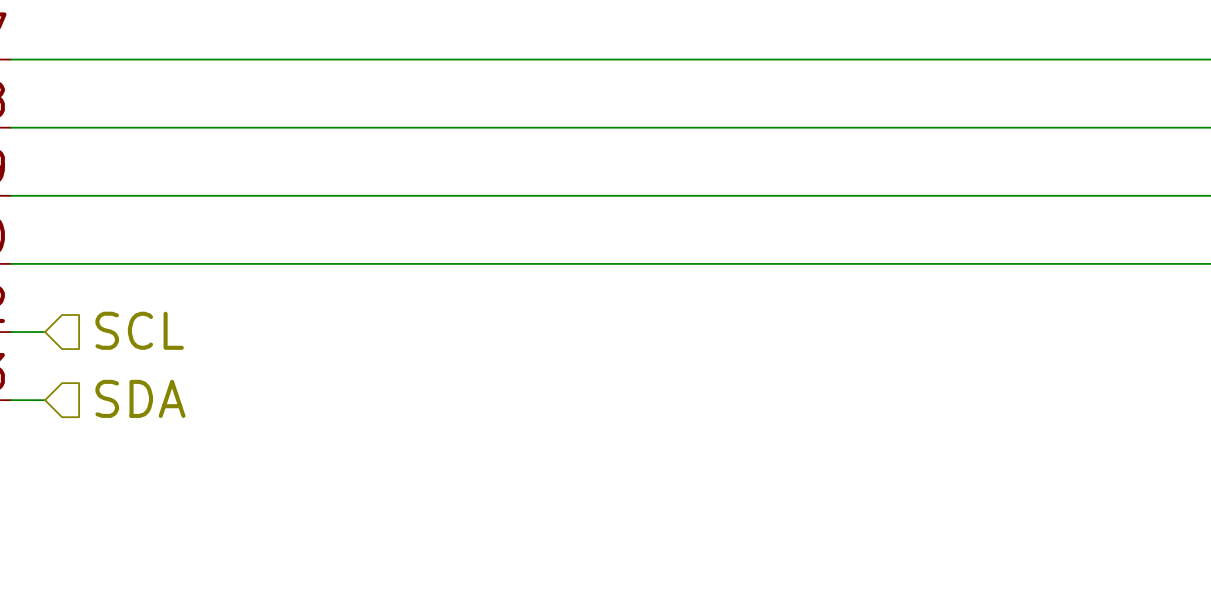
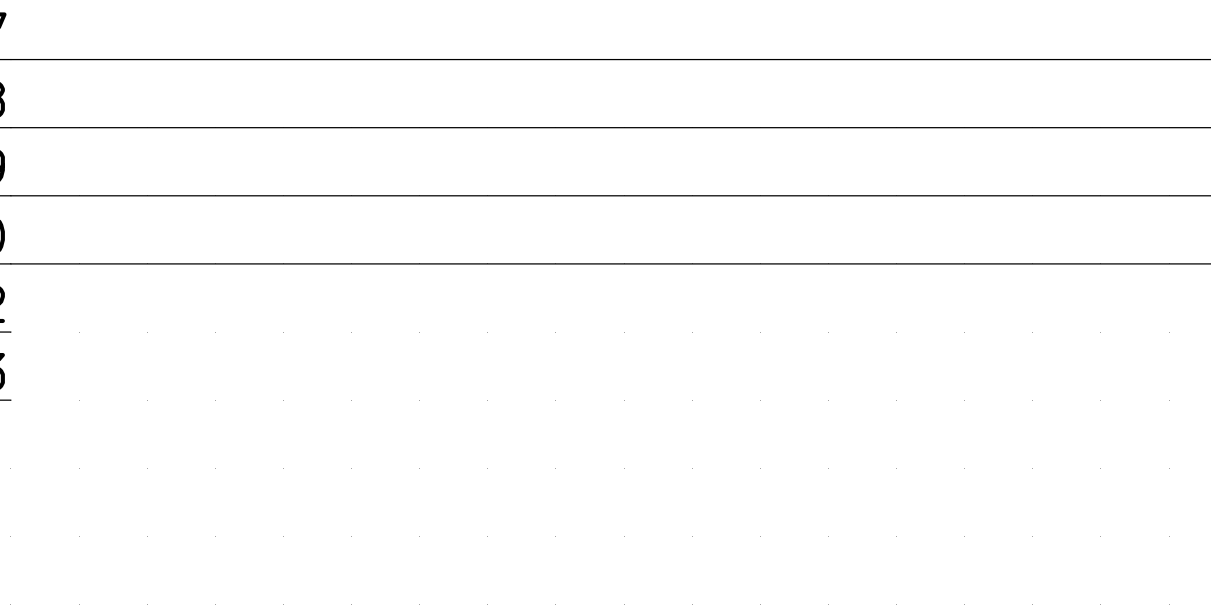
hierarchical label: SCL (139, 330) -> none
wire: (10, 332) (45, 332) -> none
hierarchical label: SDA (140, 398) -> none
wire: (10, 400) (45, 400) -> none

